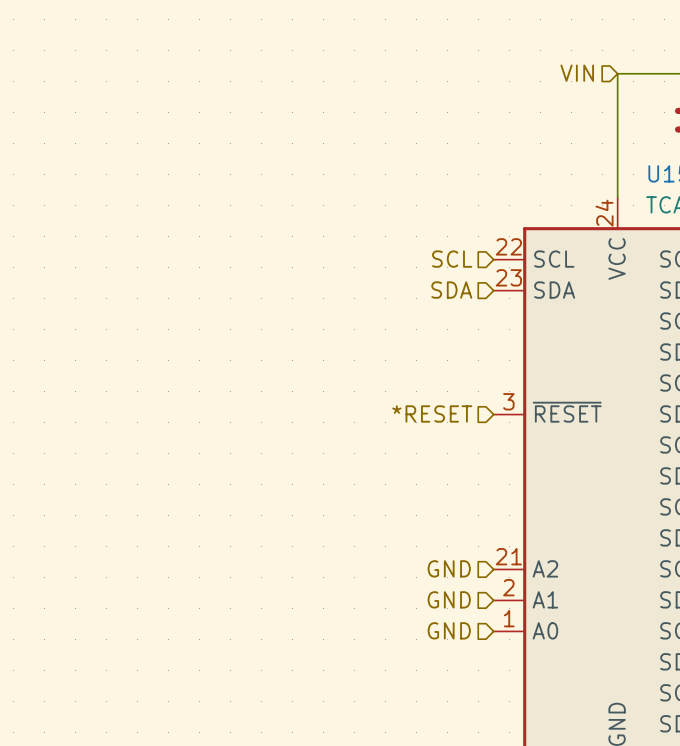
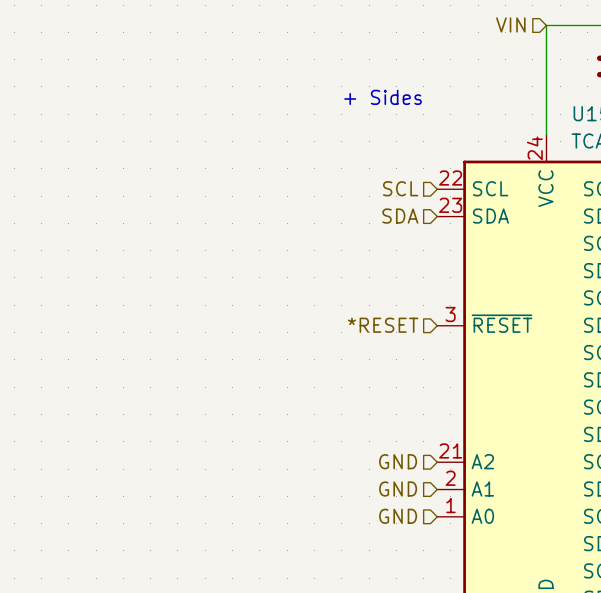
text: none -> + Sides (383, 97)

